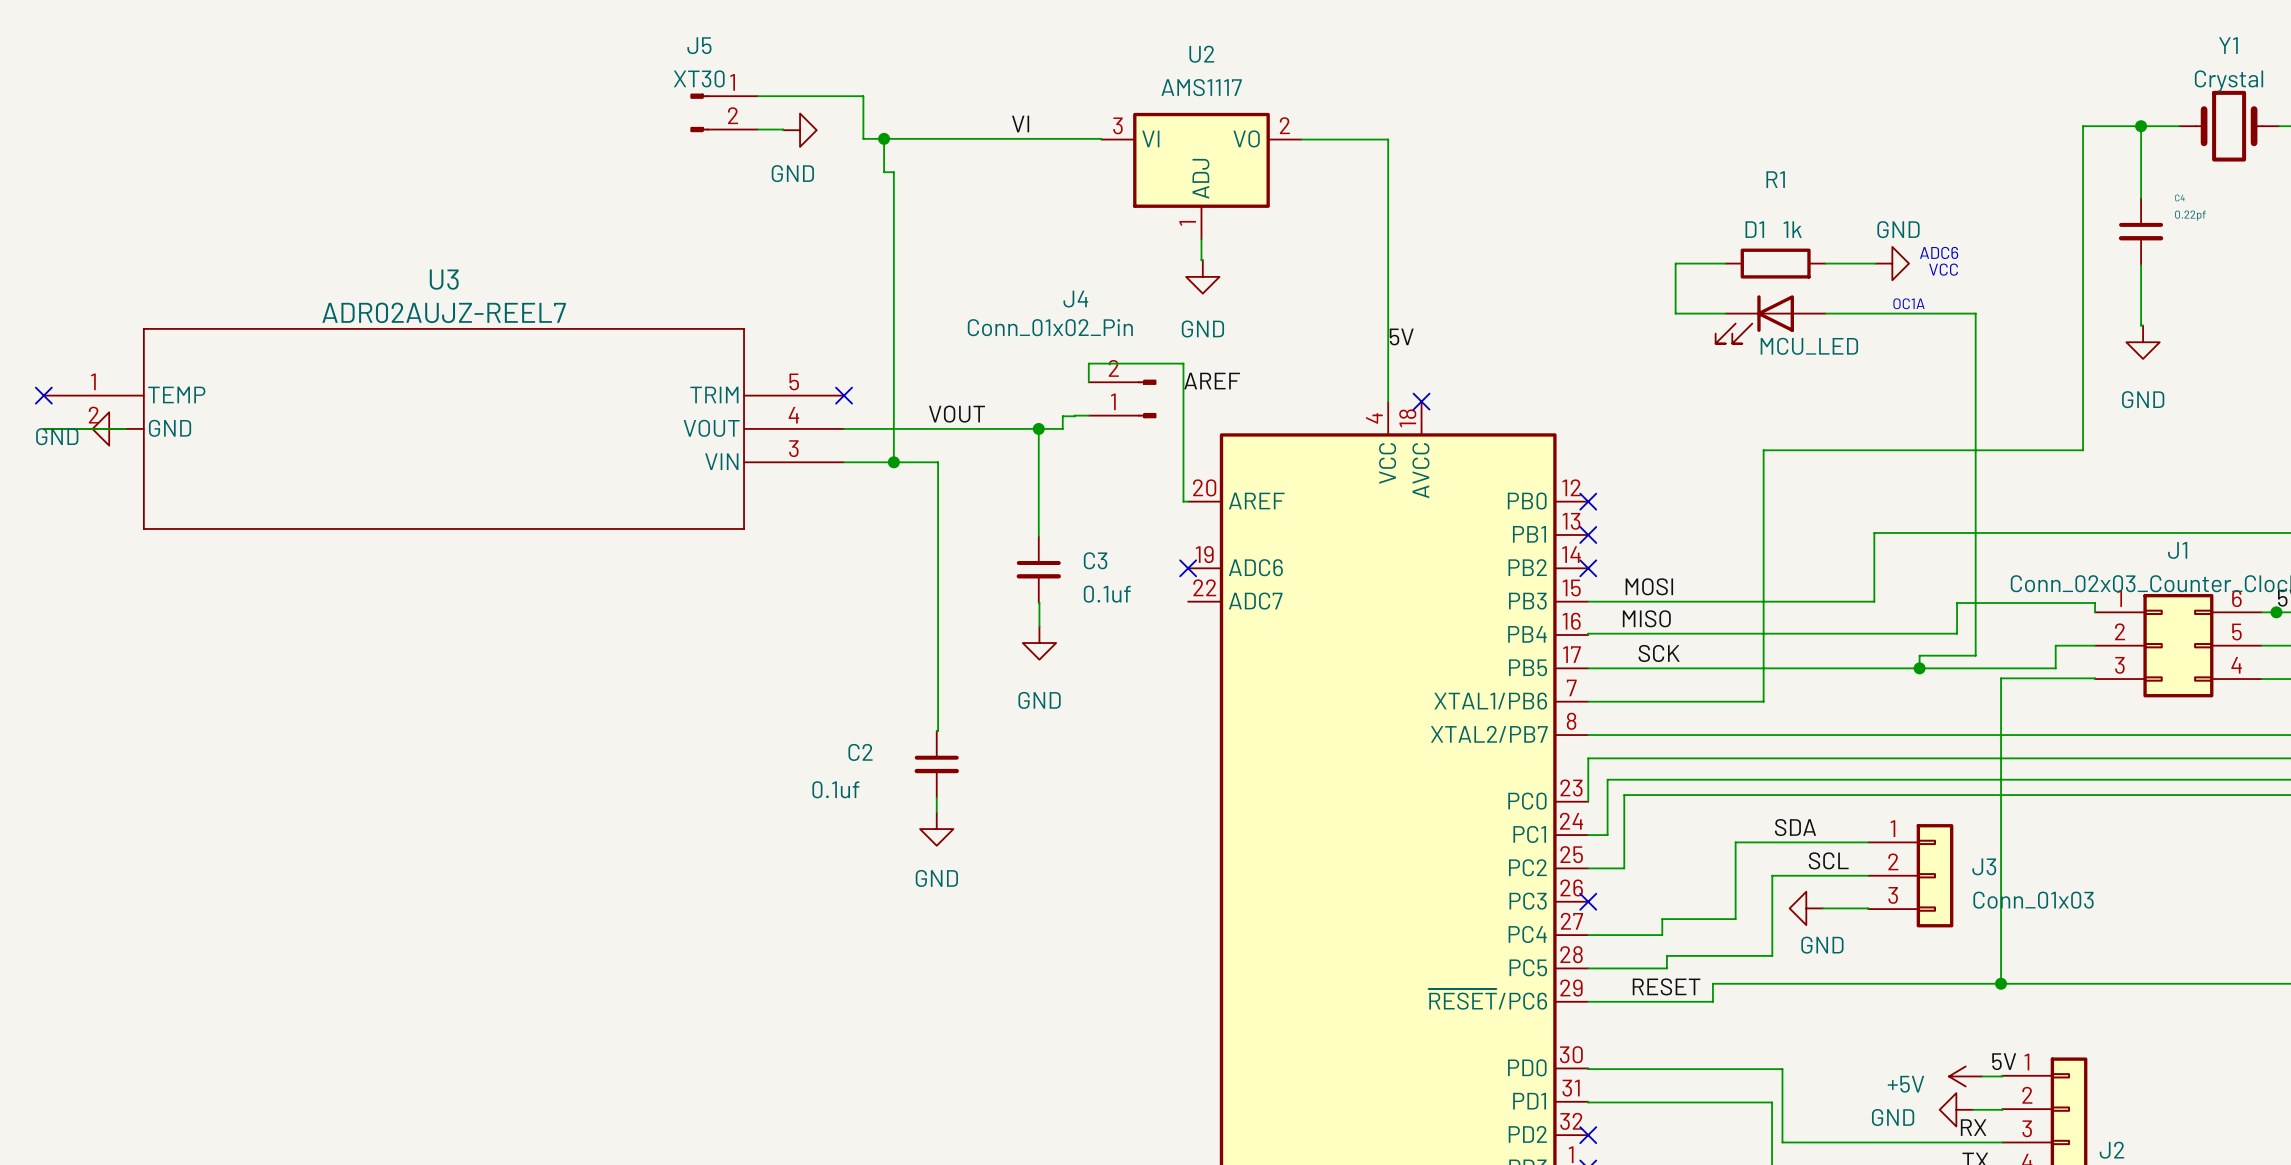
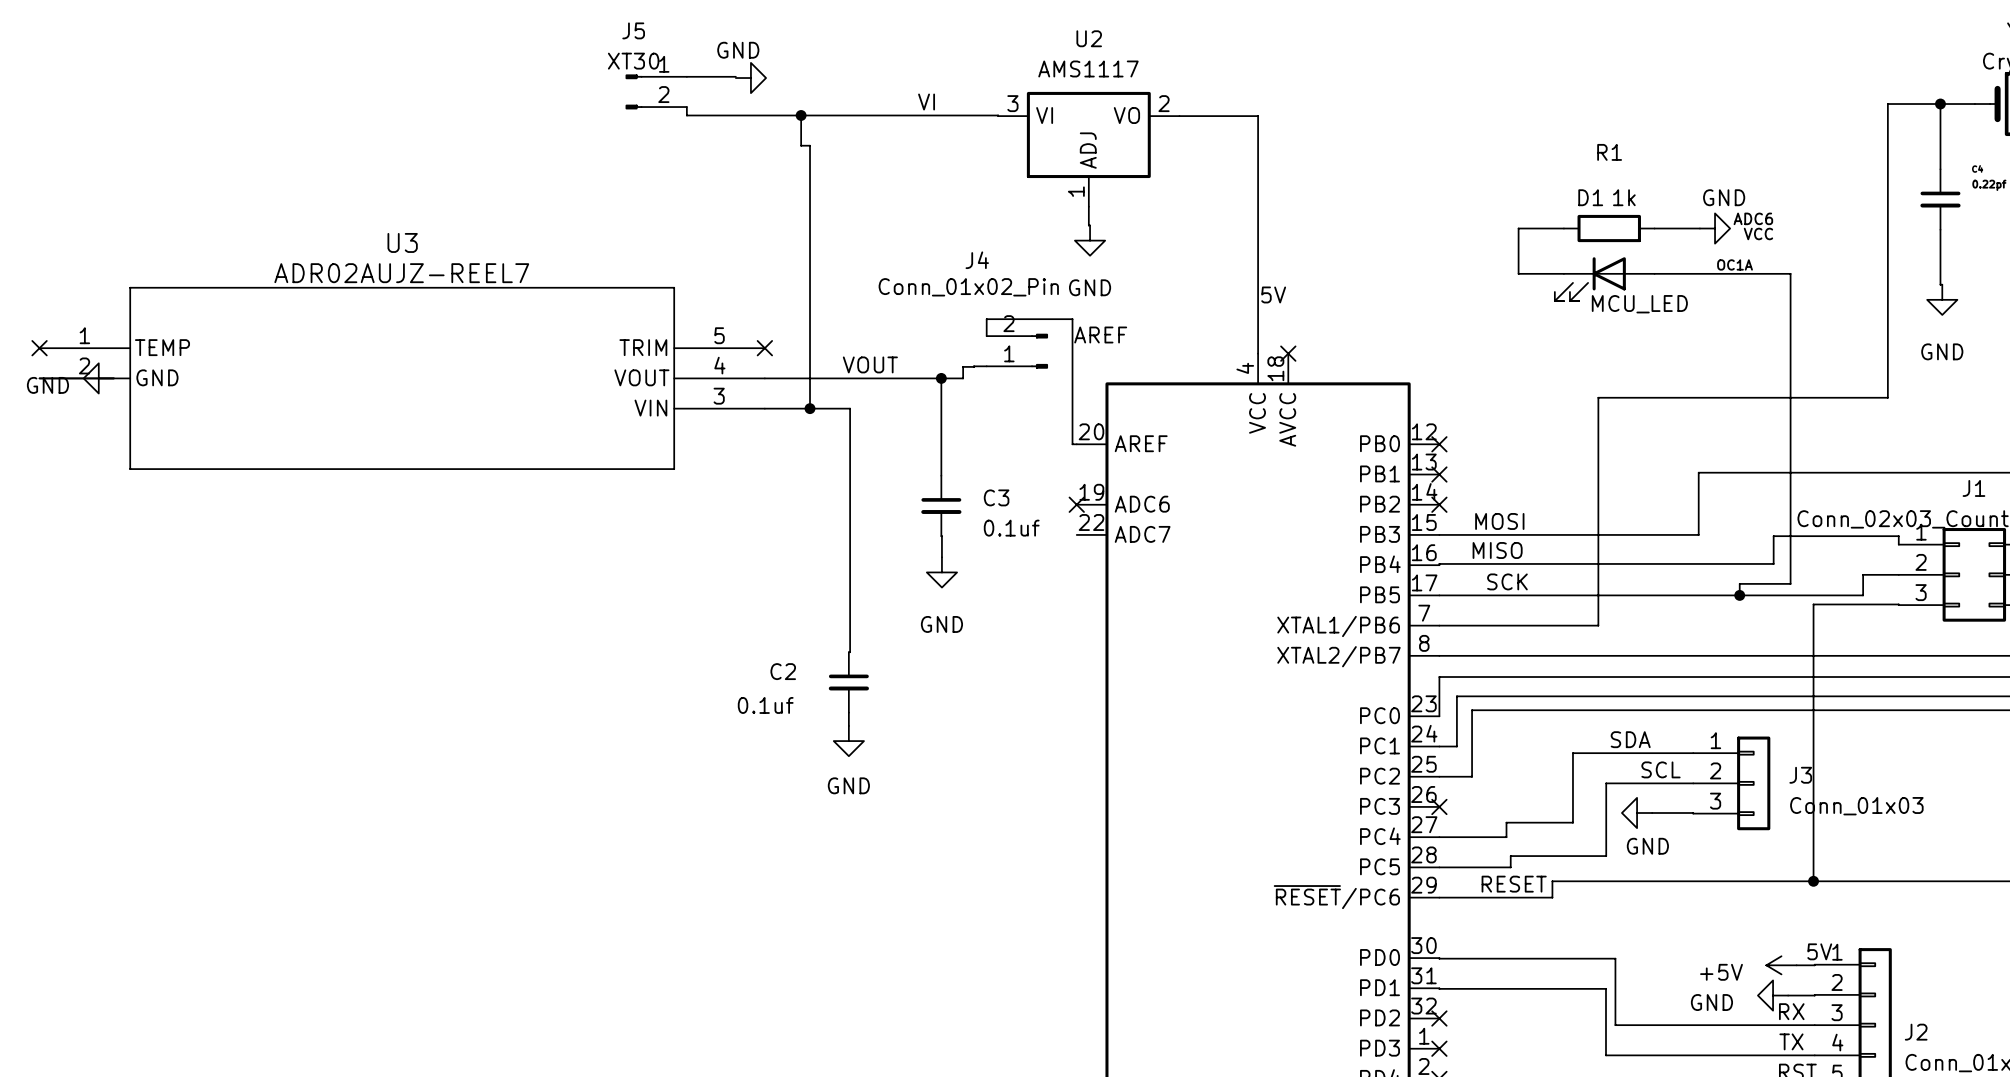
wire: (812, 96) (863, 96) (863, 138) -> (686, 107) (686, 115) (782, 115)
wire: (758, 129) (783, 130) -> none
power symbol position: GND (800, 130) -> GND (750, 78)
power symbol text position: GND (792, 173) -> GND (738, 50)

